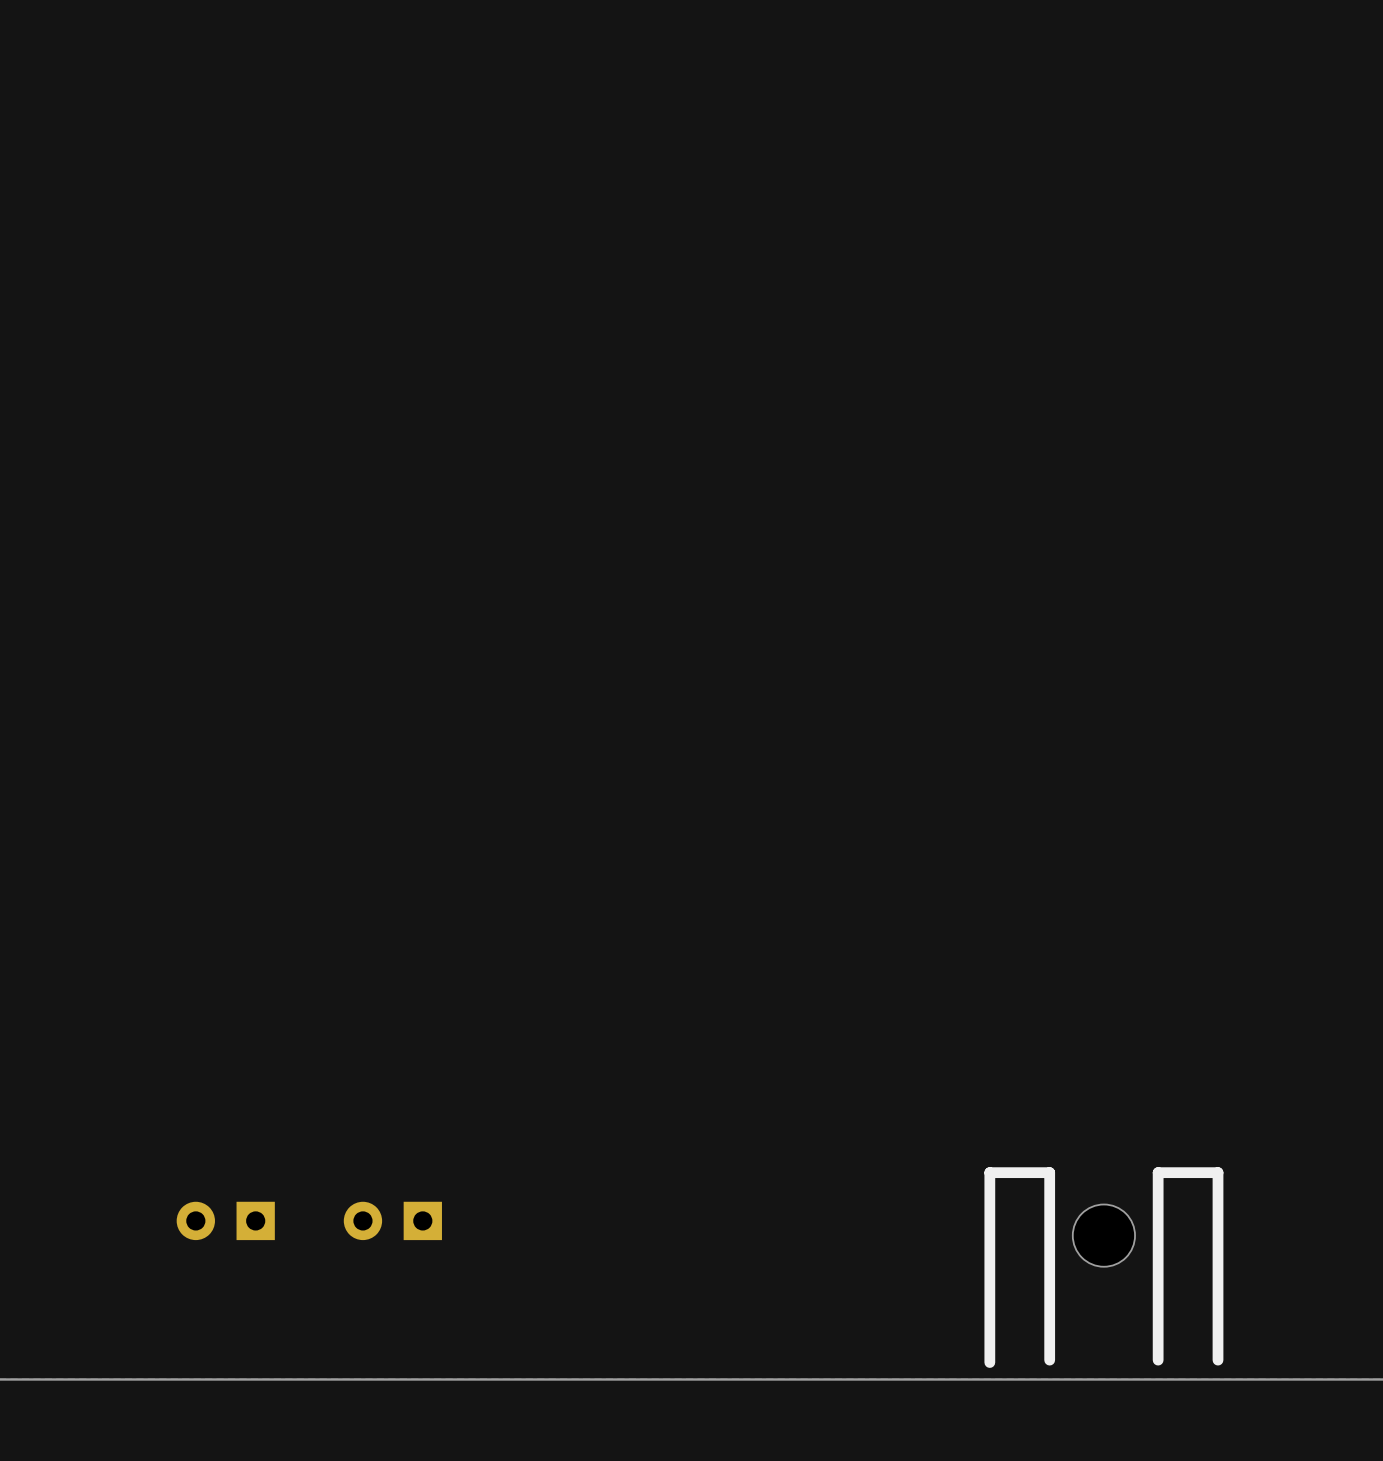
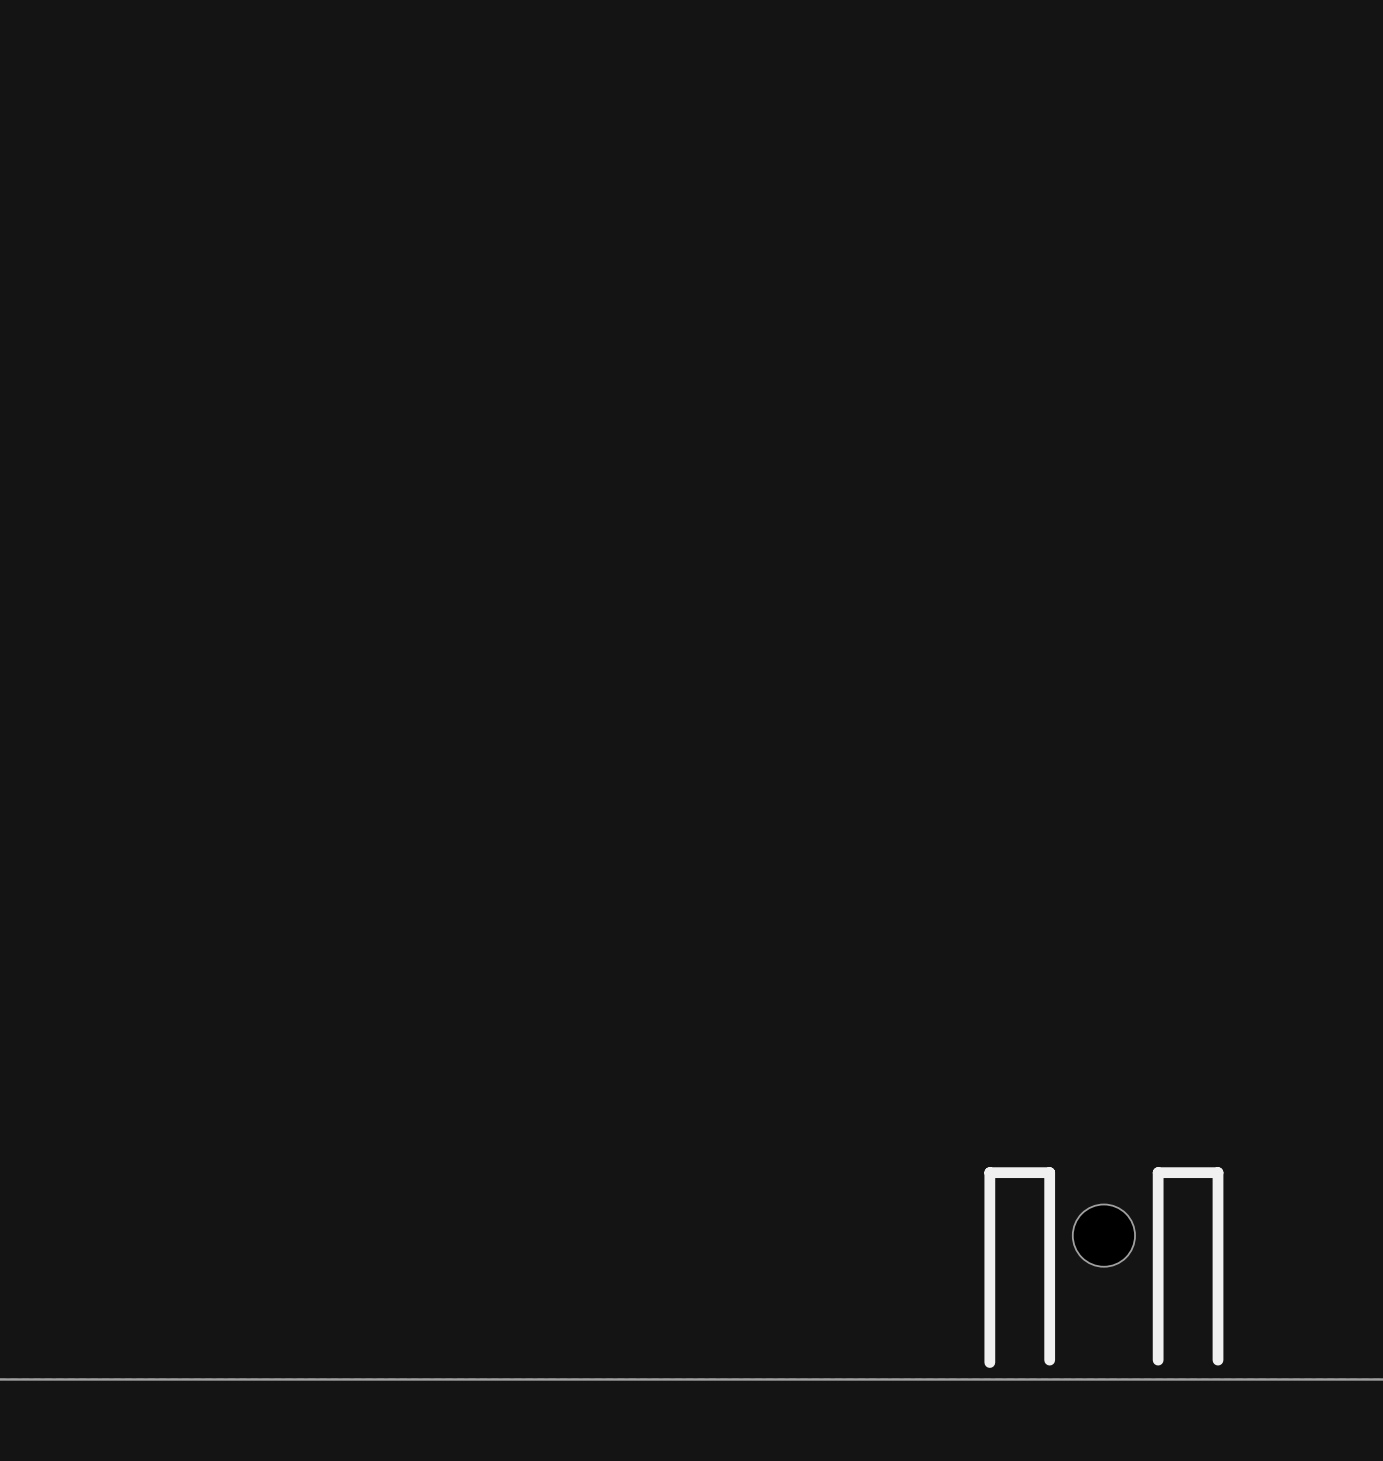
part: (225, 1220) -> none
part: (392, 1220) -> none

